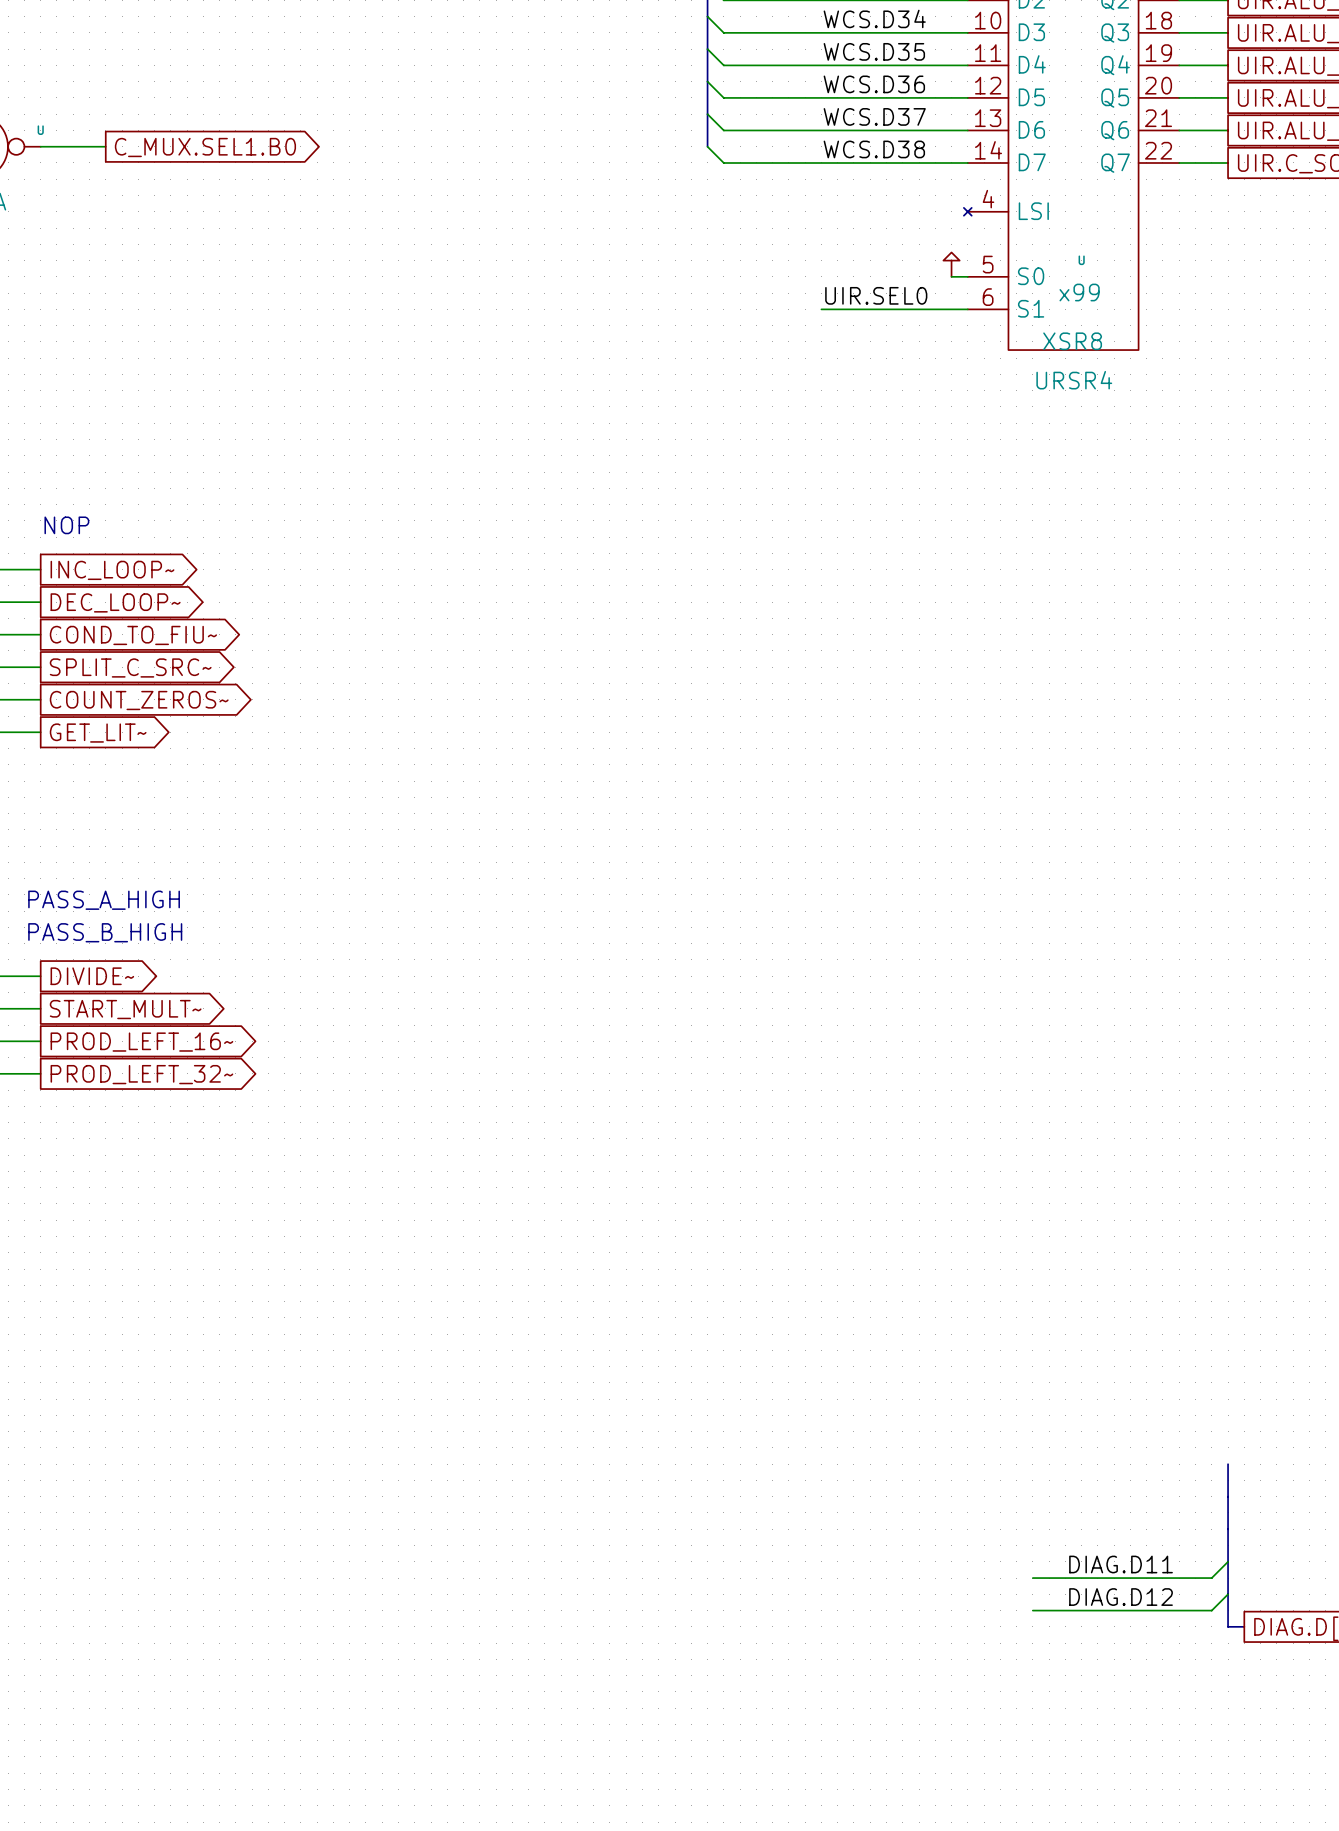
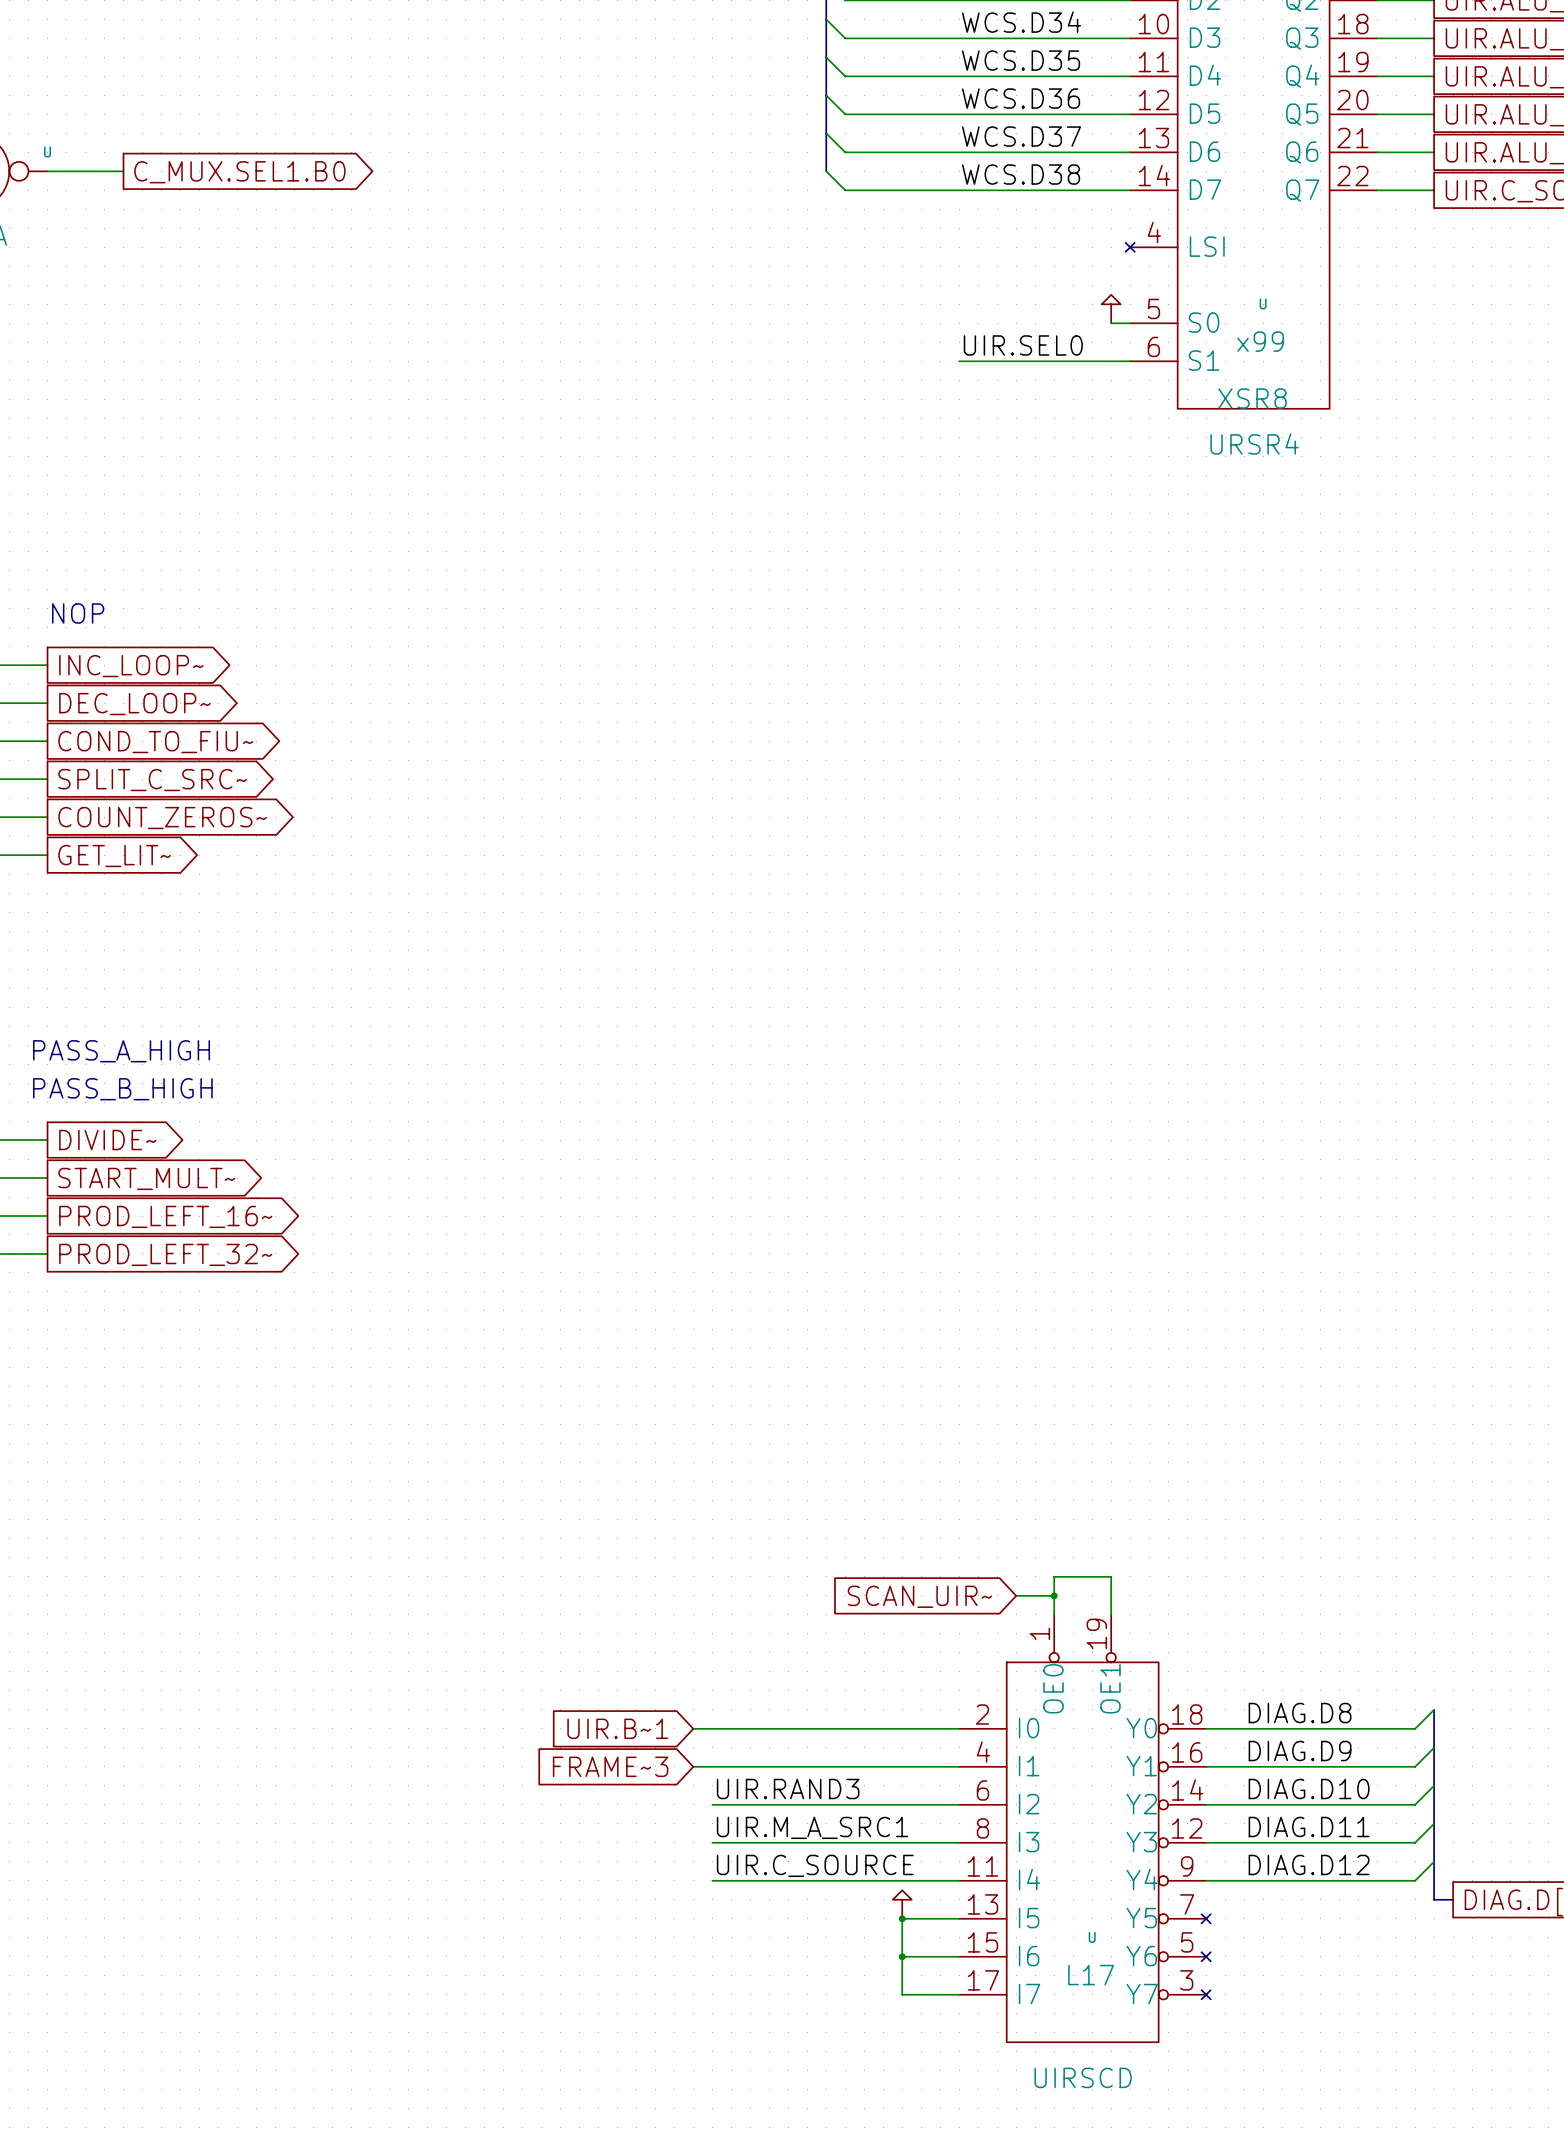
wire: none -> (1016, 1595) (1054, 1595)
junction: none -> (1054, 1595)
global label: none -> SCAN_UIR~ (919, 1596)
wire: none -> (1054, 1614) (1054, 1576) (1111, 1576) (1111, 1614)
wire: none -> (1434, 1709) (1415, 1728) (1206, 1728)
label: none -> DIAG.D8 (1300, 1713)
global label: none -> UIR.B~1 (617, 1728)
wire: none -> (693, 1728) (959, 1728)
wire: none -> (1434, 1747) (1415, 1766) (1206, 1766)
label: none -> DIAG.D9 (1300, 1751)
global label: none -> FRAME~3 (610, 1766)
wire: none -> (693, 1766) (959, 1766)
wire: none -> (1434, 1785) (1415, 1804) (1206, 1804)
label: none -> UIR.RAND3 (788, 1789)
label: none -> DIAG.D10 (1309, 1789)
wire: none -> (712, 1804) (959, 1804)
label: none -> UIR.M_A_SRC1 (812, 1827)
U: none -> (1082, 1828)
wire: none -> (712, 1842) (959, 1842)
label: none -> UIR.C_SOURCE (815, 1865)
wire: none -> (712, 1880) (959, 1880)
power symbol: none -> (902, 1904)
junction: none -> (902, 1918)
wire: none -> (959, 1918) (902, 1918) (902, 1994) (959, 1994)
no-connect mark: none -> (1206, 1918)
wire: none -> (902, 1956) (959, 1956)
junction: none -> (902, 1956)
no-connect mark: none -> (1206, 1956)
no-connect mark: none -> (1206, 1994)

